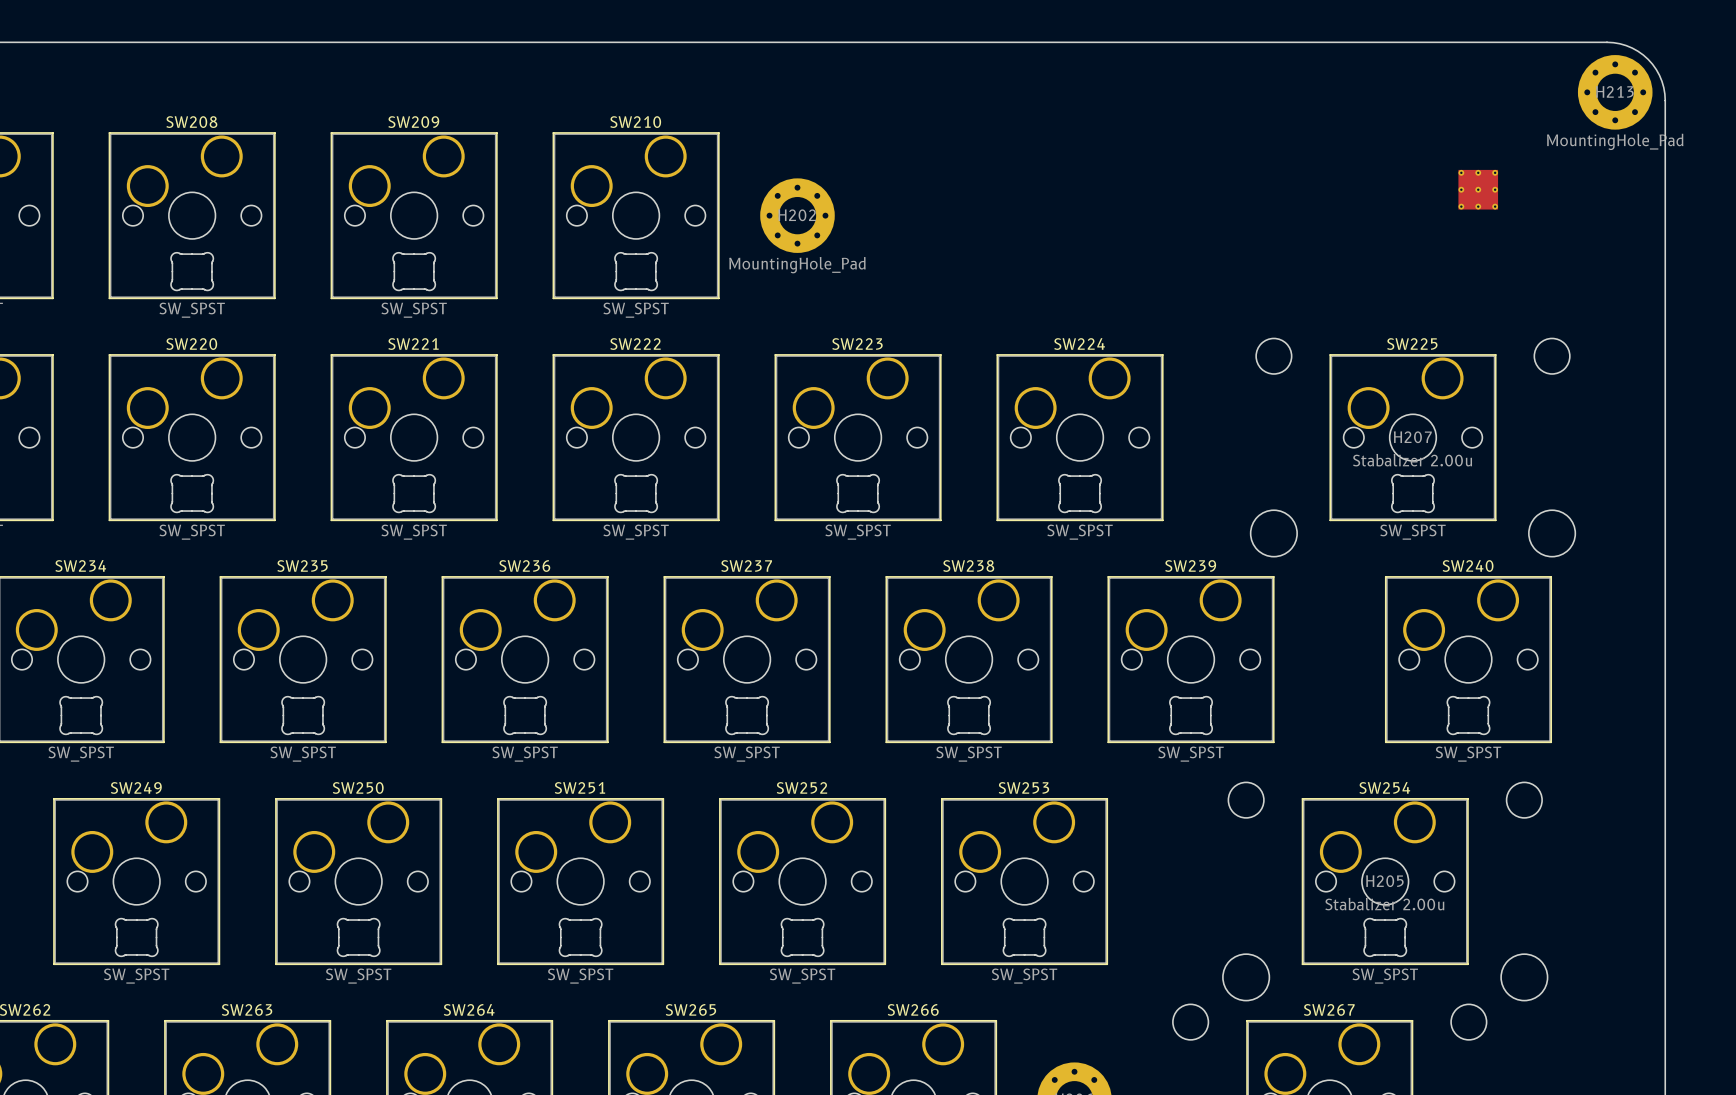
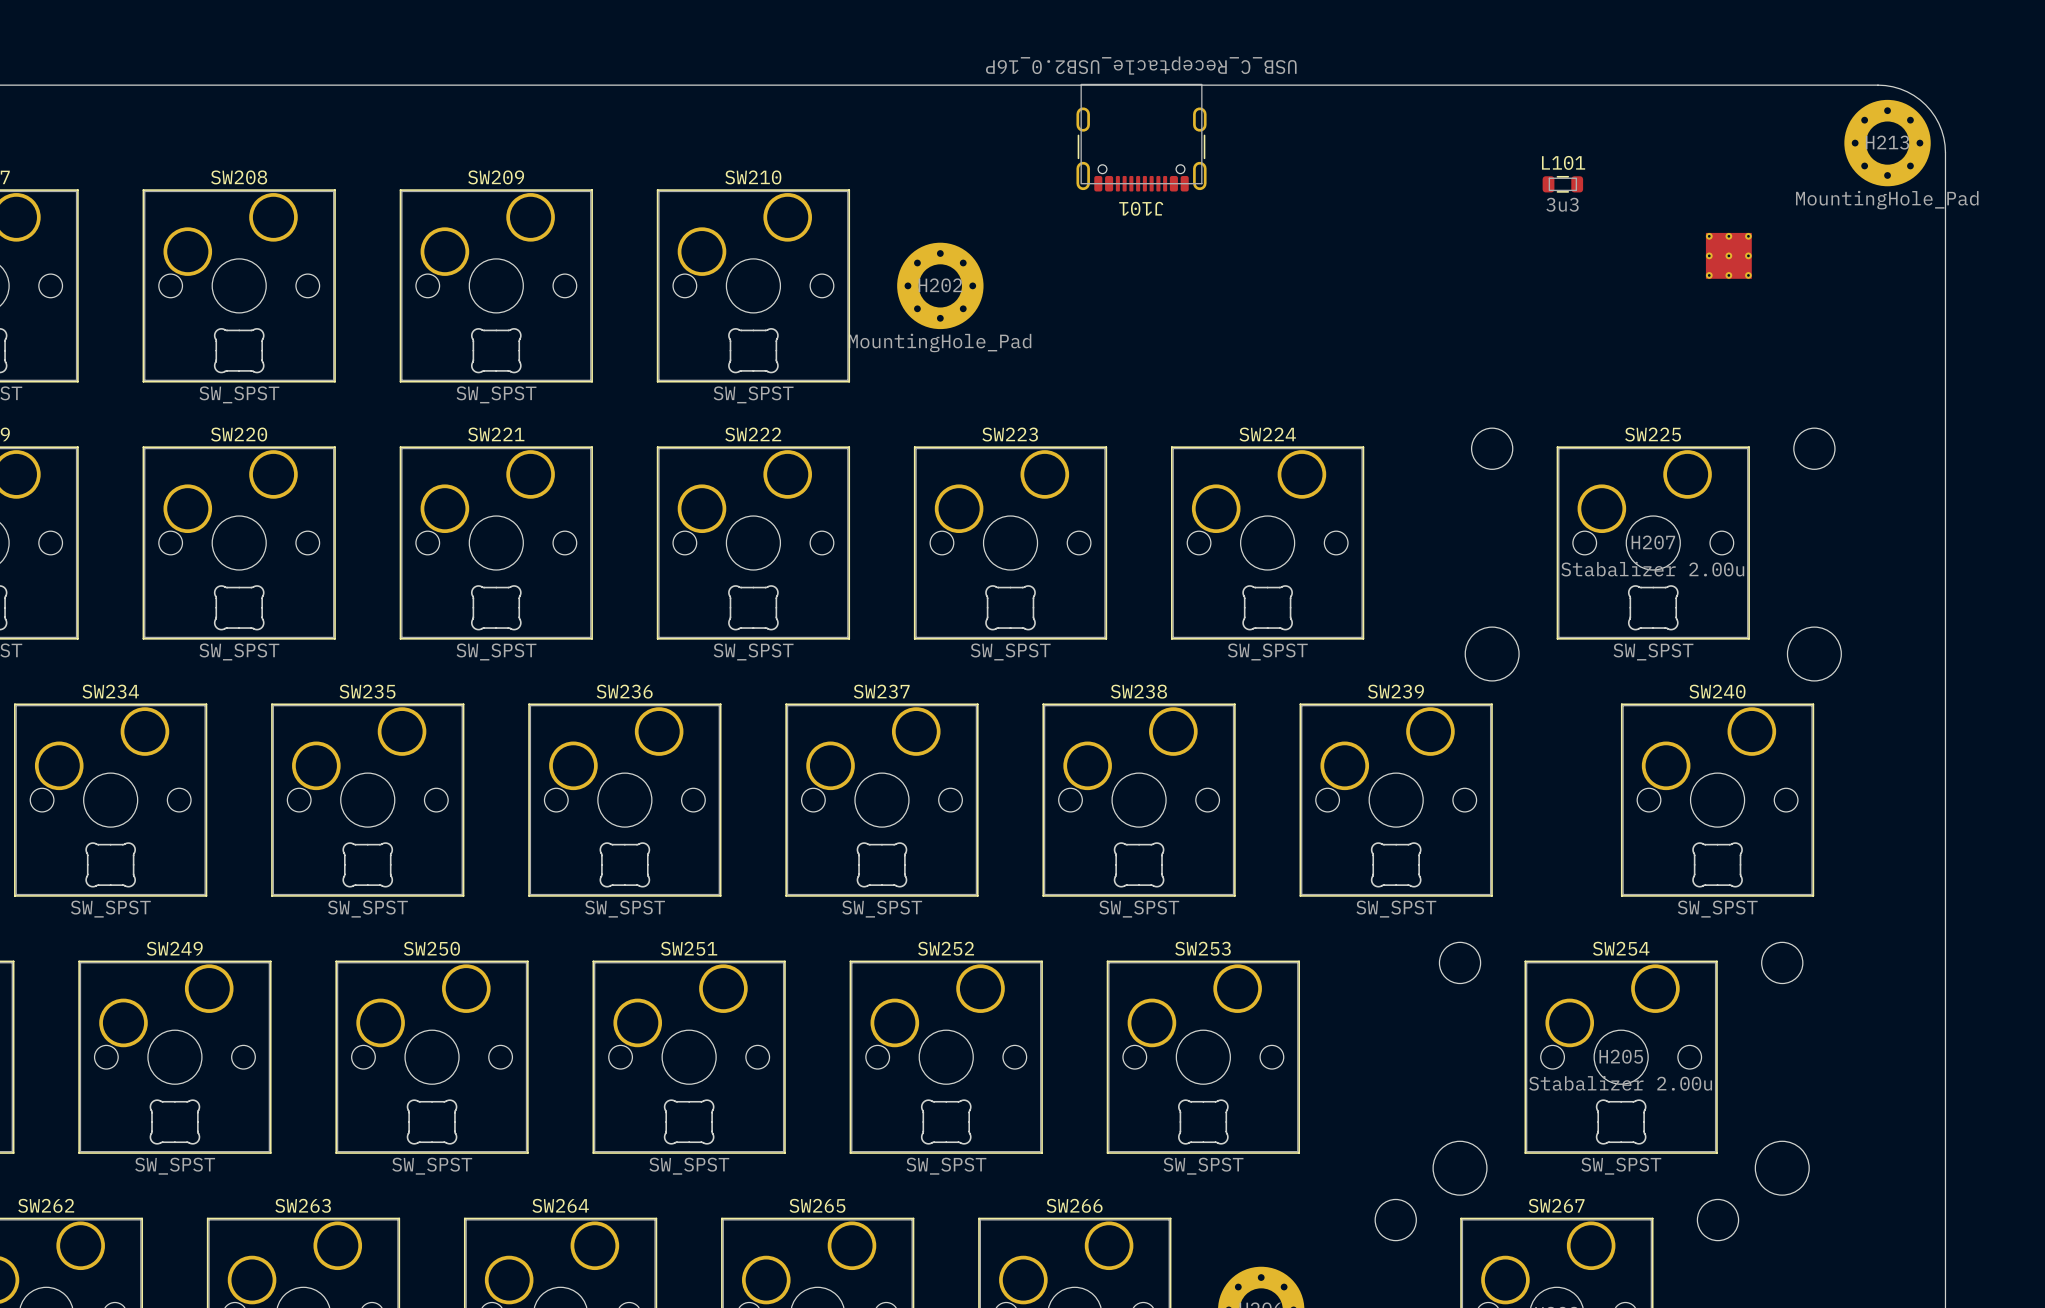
J101: none -> USB_C_Receptacle_USB2.0_16P (1141, 137)
L101: none -> 3u3 (1562, 184)

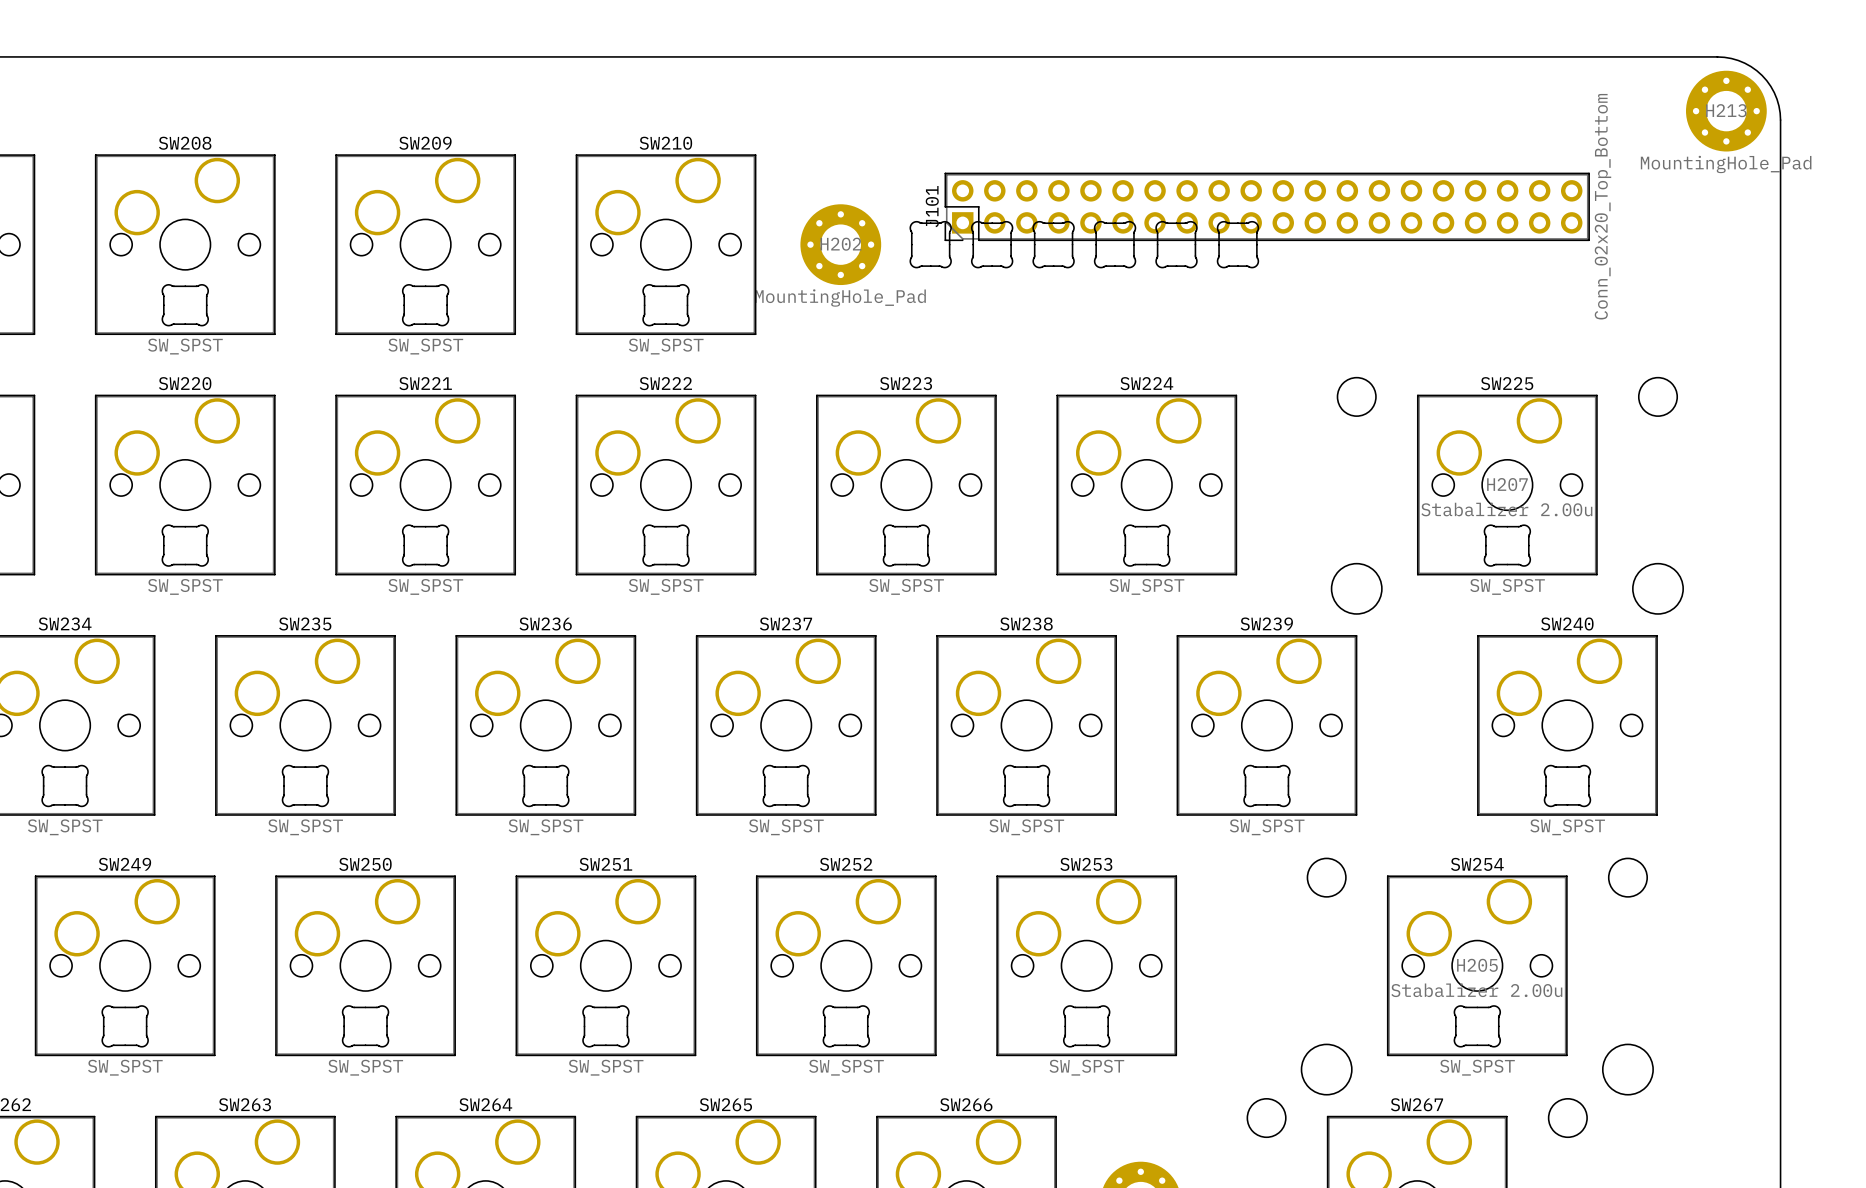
J101 value: USB_C_Receptacle_USB2.0_16P (1141, 65) -> Conn_02x20_Top_Bottom (1602, 206)
J101 footprint: [1076, 83, 1207, 192] -> [944, 172, 1590, 242]
L101: 3u3 (1562, 184) -> none
J101 name position: J101 (1141, 208) -> J101 (932, 206)
part: (1728, 255) -> none
part: none -> (930, 244)
part: none -> (992, 244)
part: none -> (1053, 244)
part: none -> (1115, 244)
part: none -> (1176, 244)
part: none -> (1237, 244)

